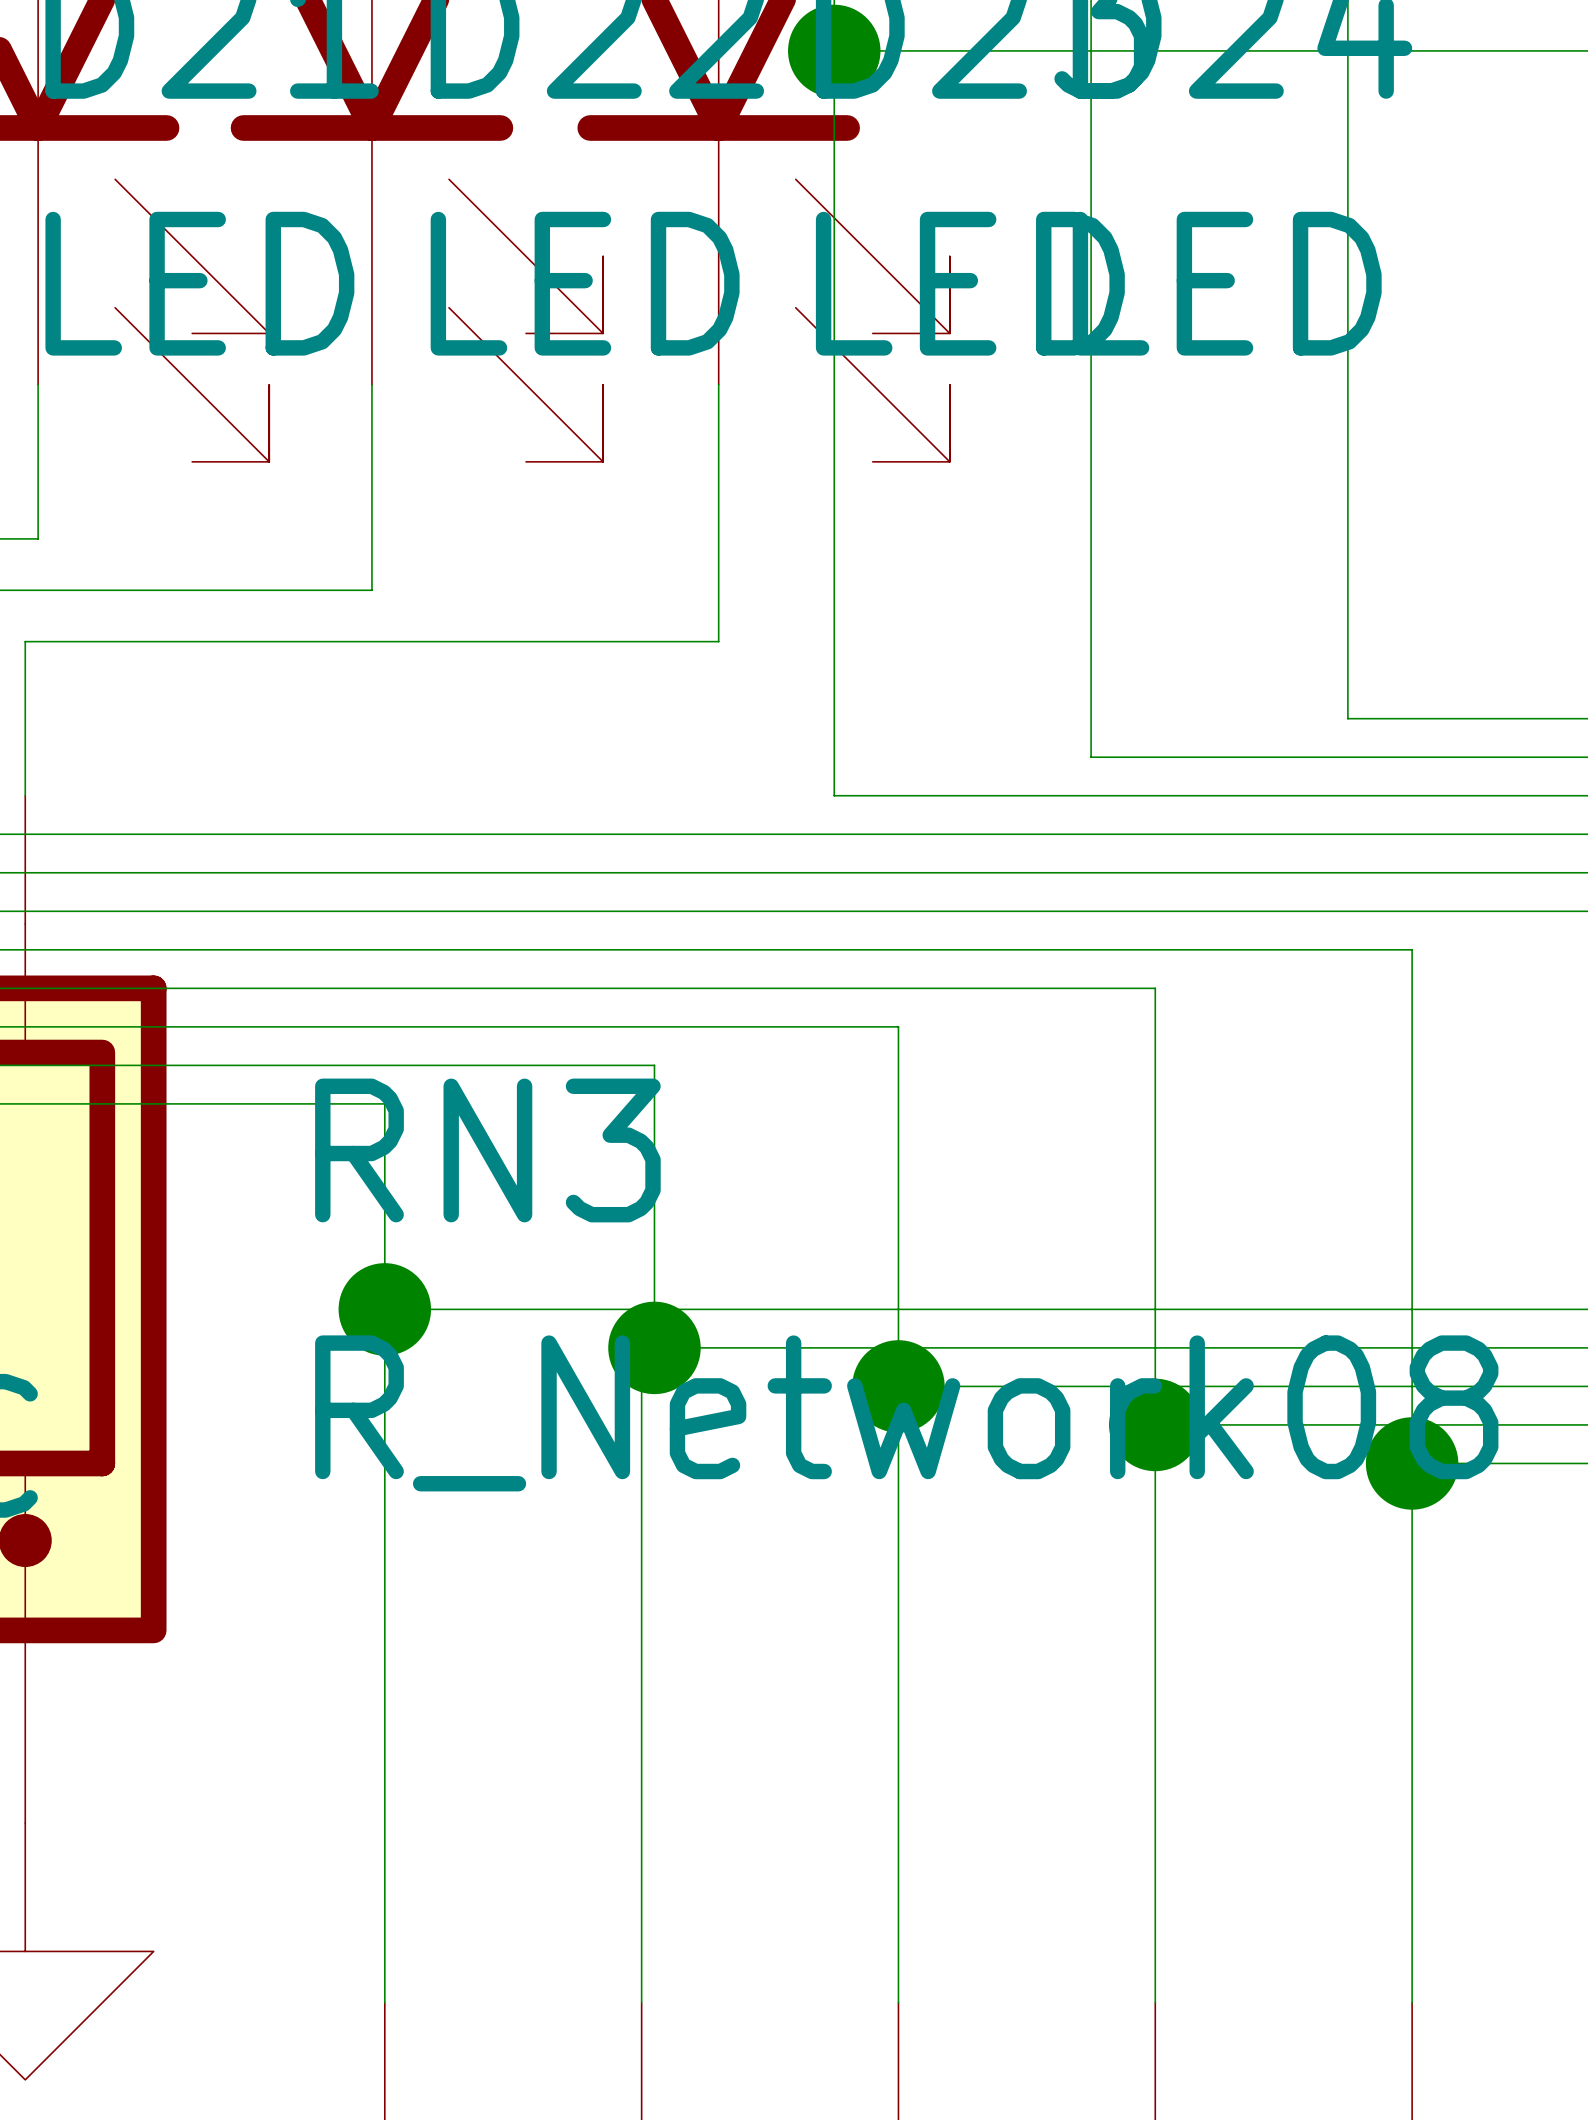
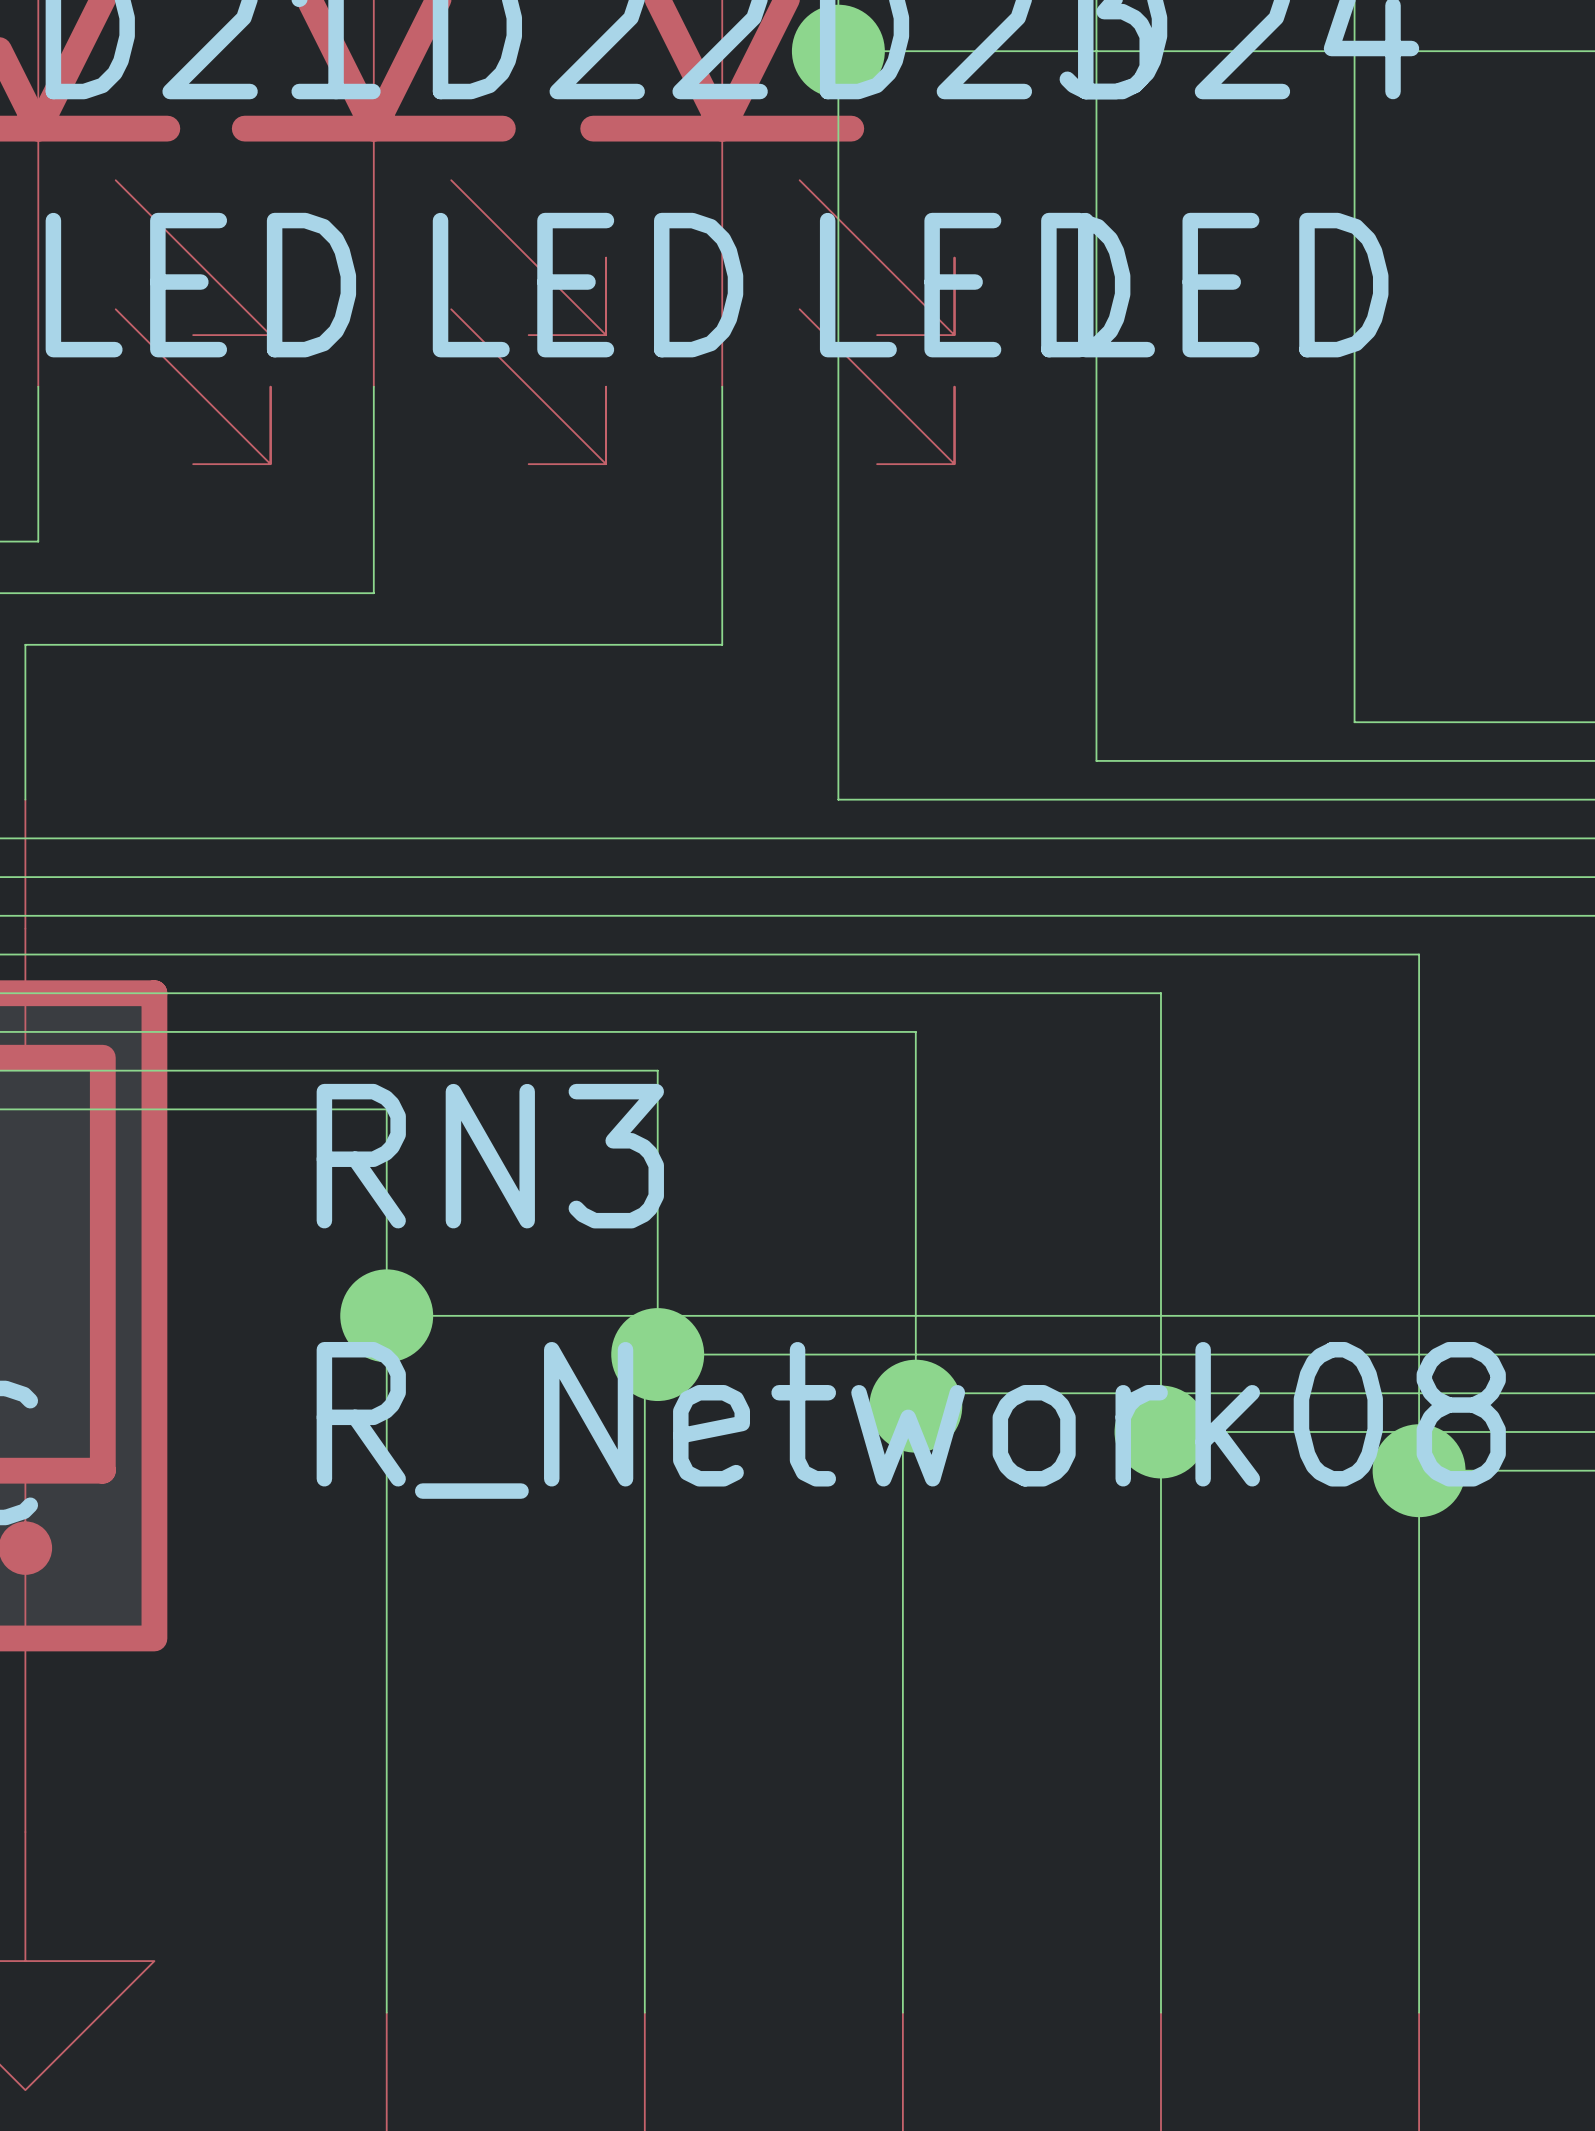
wire: (898, 1026) (898, 1386) -> (902, 1031) (915, 1031) (915, 1406)
junction position: (898, 1386) -> (915, 1406)

